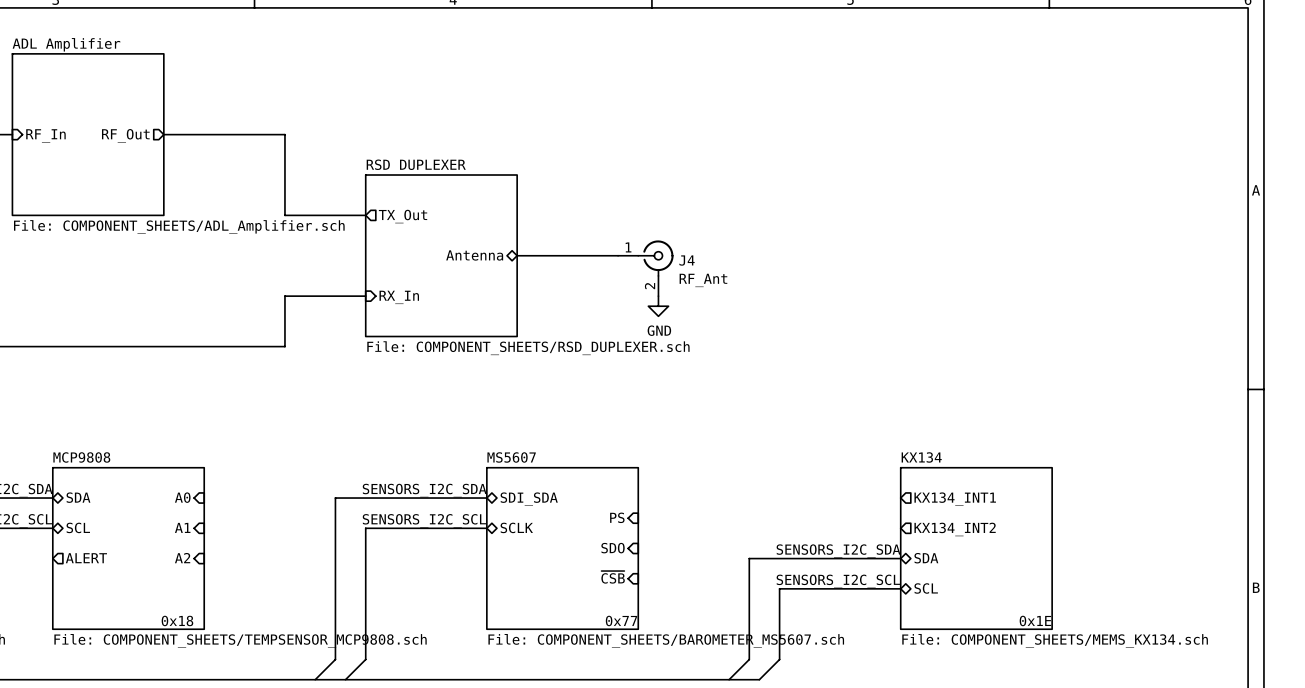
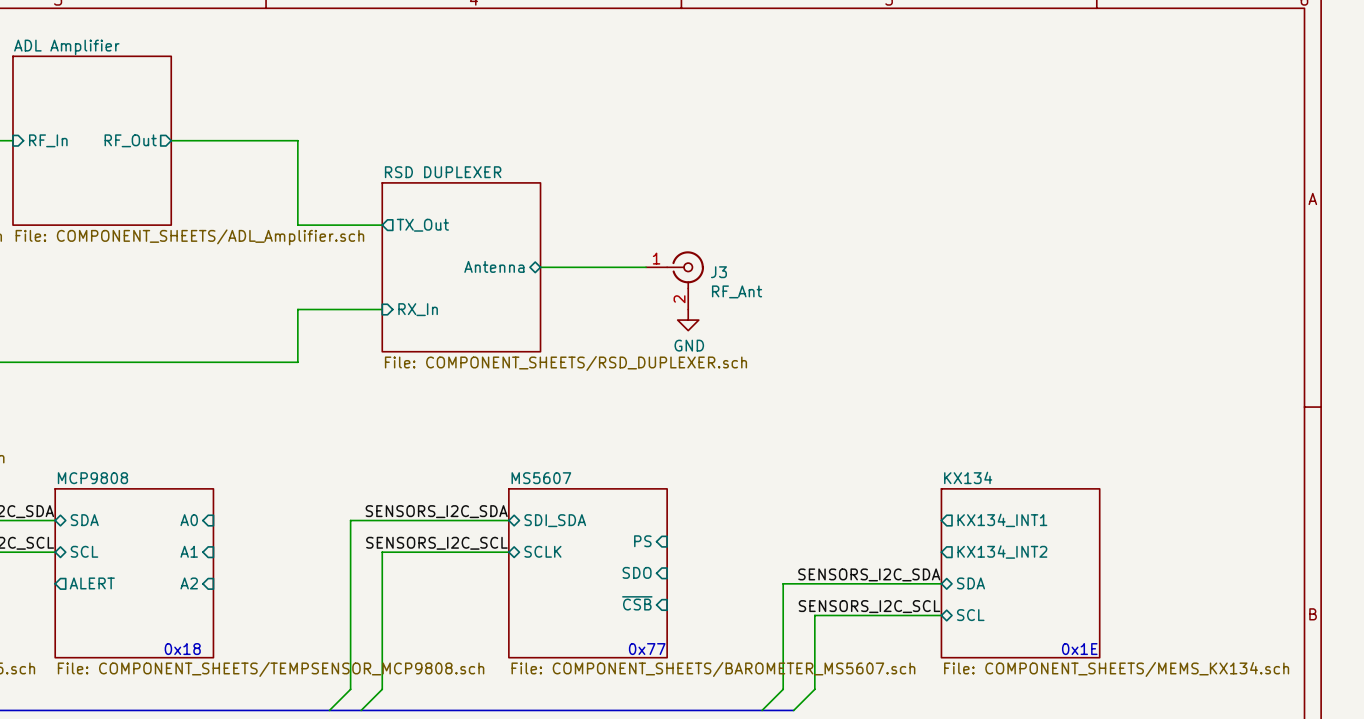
J4 name: J4 (687, 260) -> J3 (718, 272)

